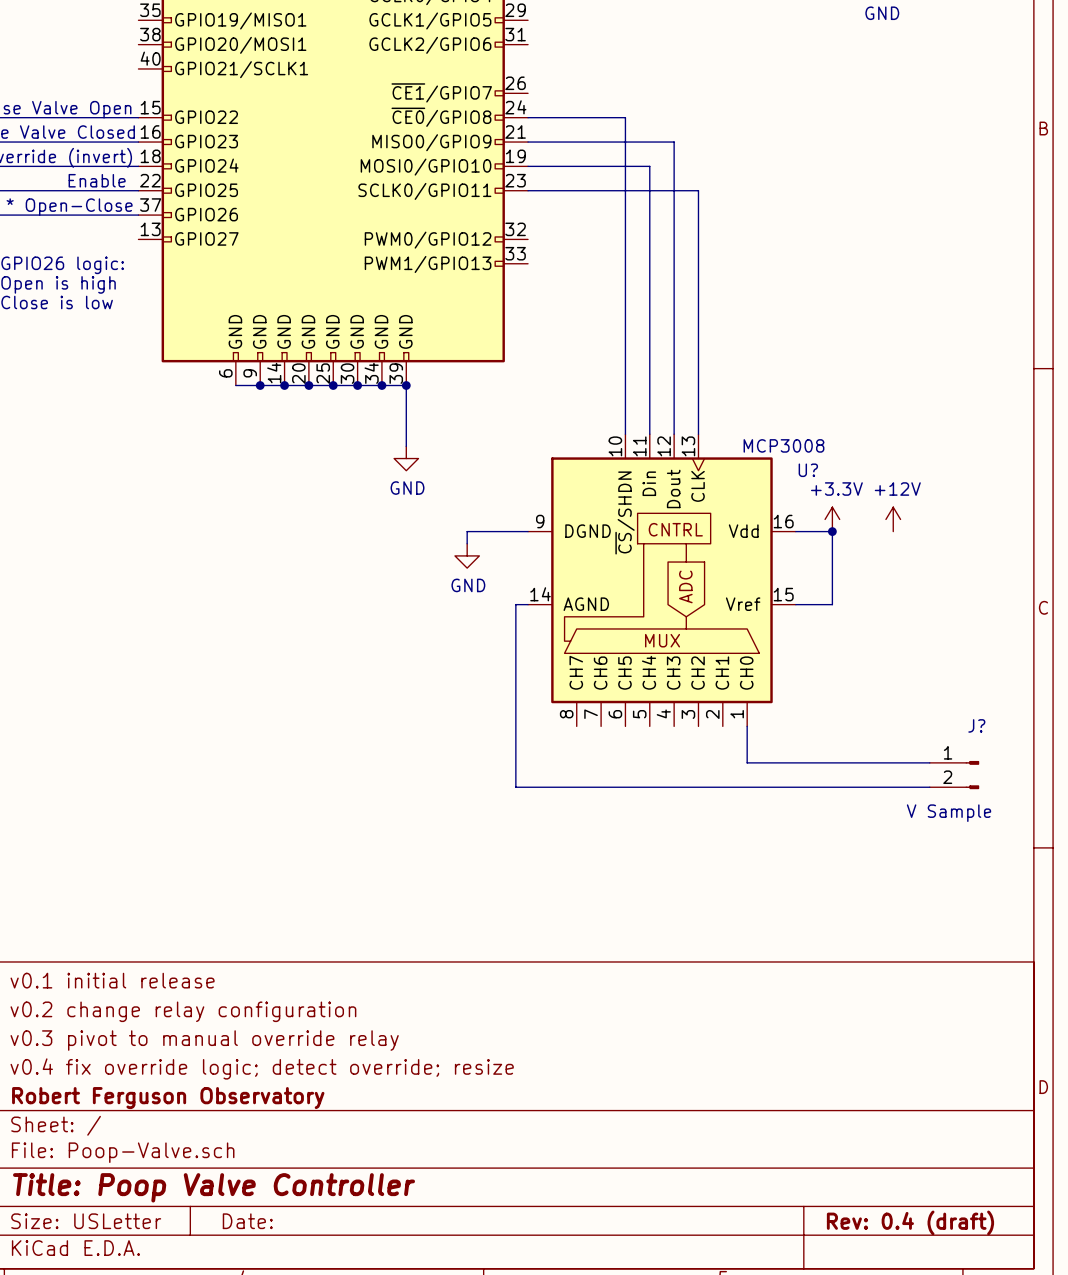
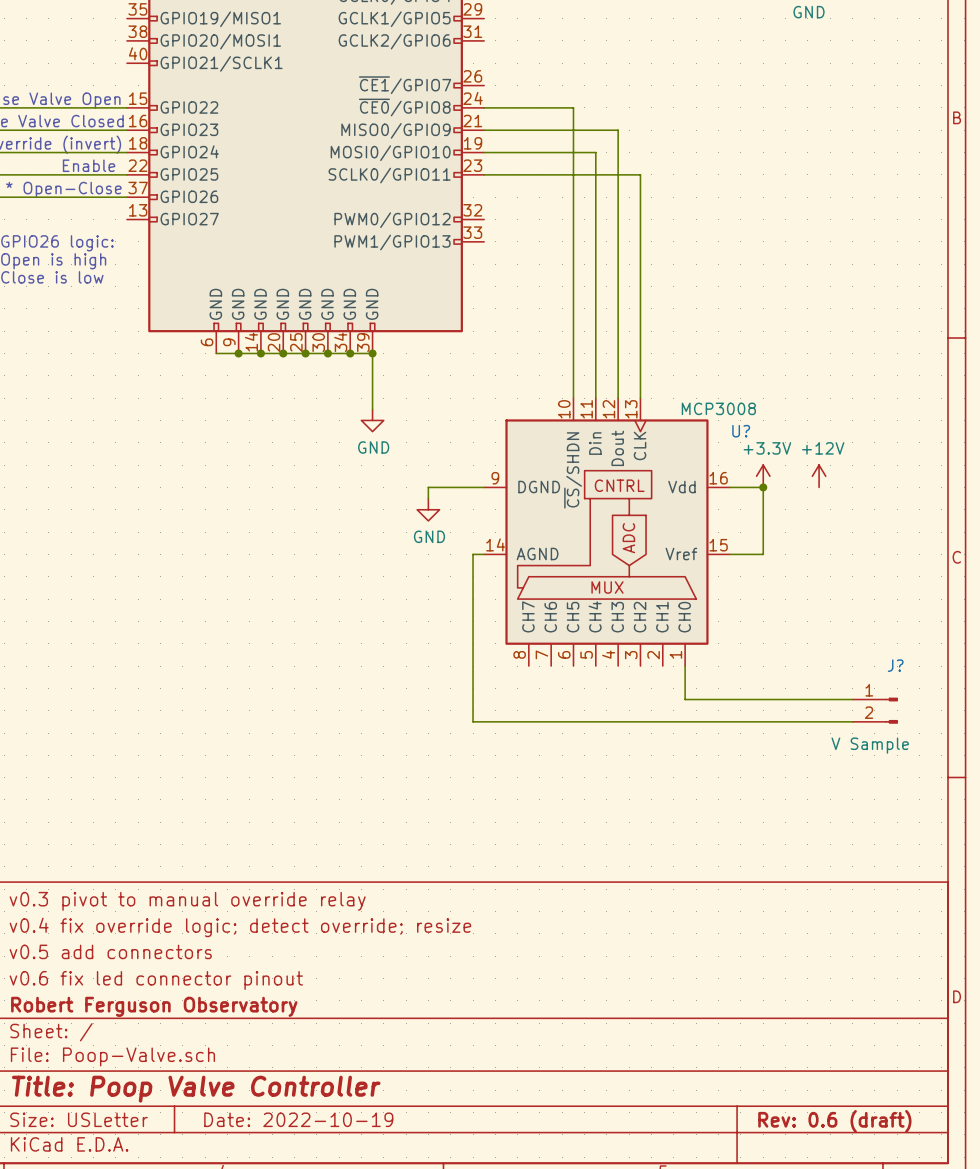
title block: v0.1 initial release (112, 980) -> v0.3 pivot to manual override relay (187, 901)
title block: v0.2 change relay configuration (183, 1011) -> v0.4 fix override logic; detect override; resize (240, 927)
title block: v0.3 pivot to manual override relay (204, 1040) -> v0.5 add connectors (110, 951)
title block: v0.4 fix override logic; detect override; resize (262, 1068) -> v0.6 fix led connector pinout (156, 980)
title block: Date: (247, 1221) -> Date: 2022-10-19 (298, 1119)
title block: Rev: 0.4 (draft) (910, 1222) -> Rev: 0.6 (draft) (834, 1121)

